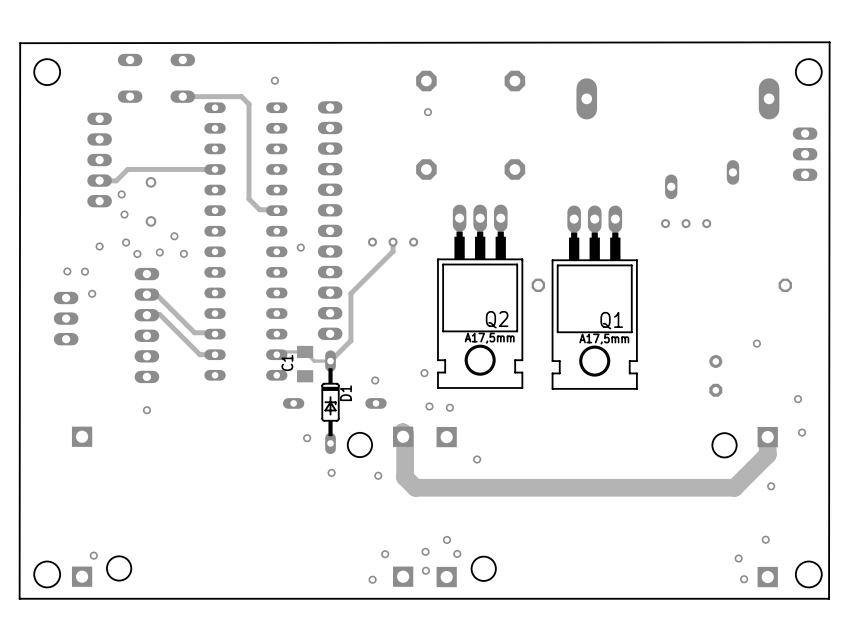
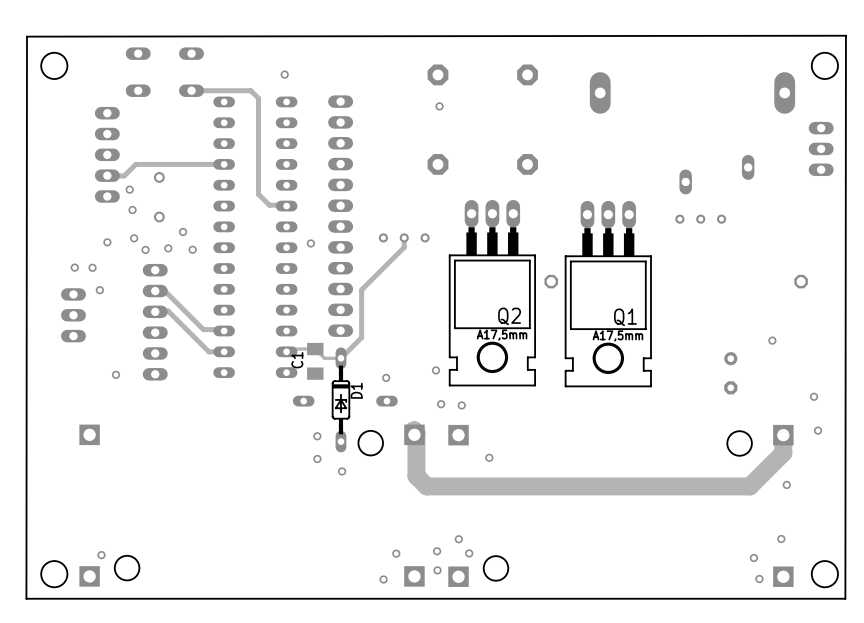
via: none -> (115, 374)
via: (146, 410) -> none
via: none -> (317, 458)
via: (378, 475) -> none

